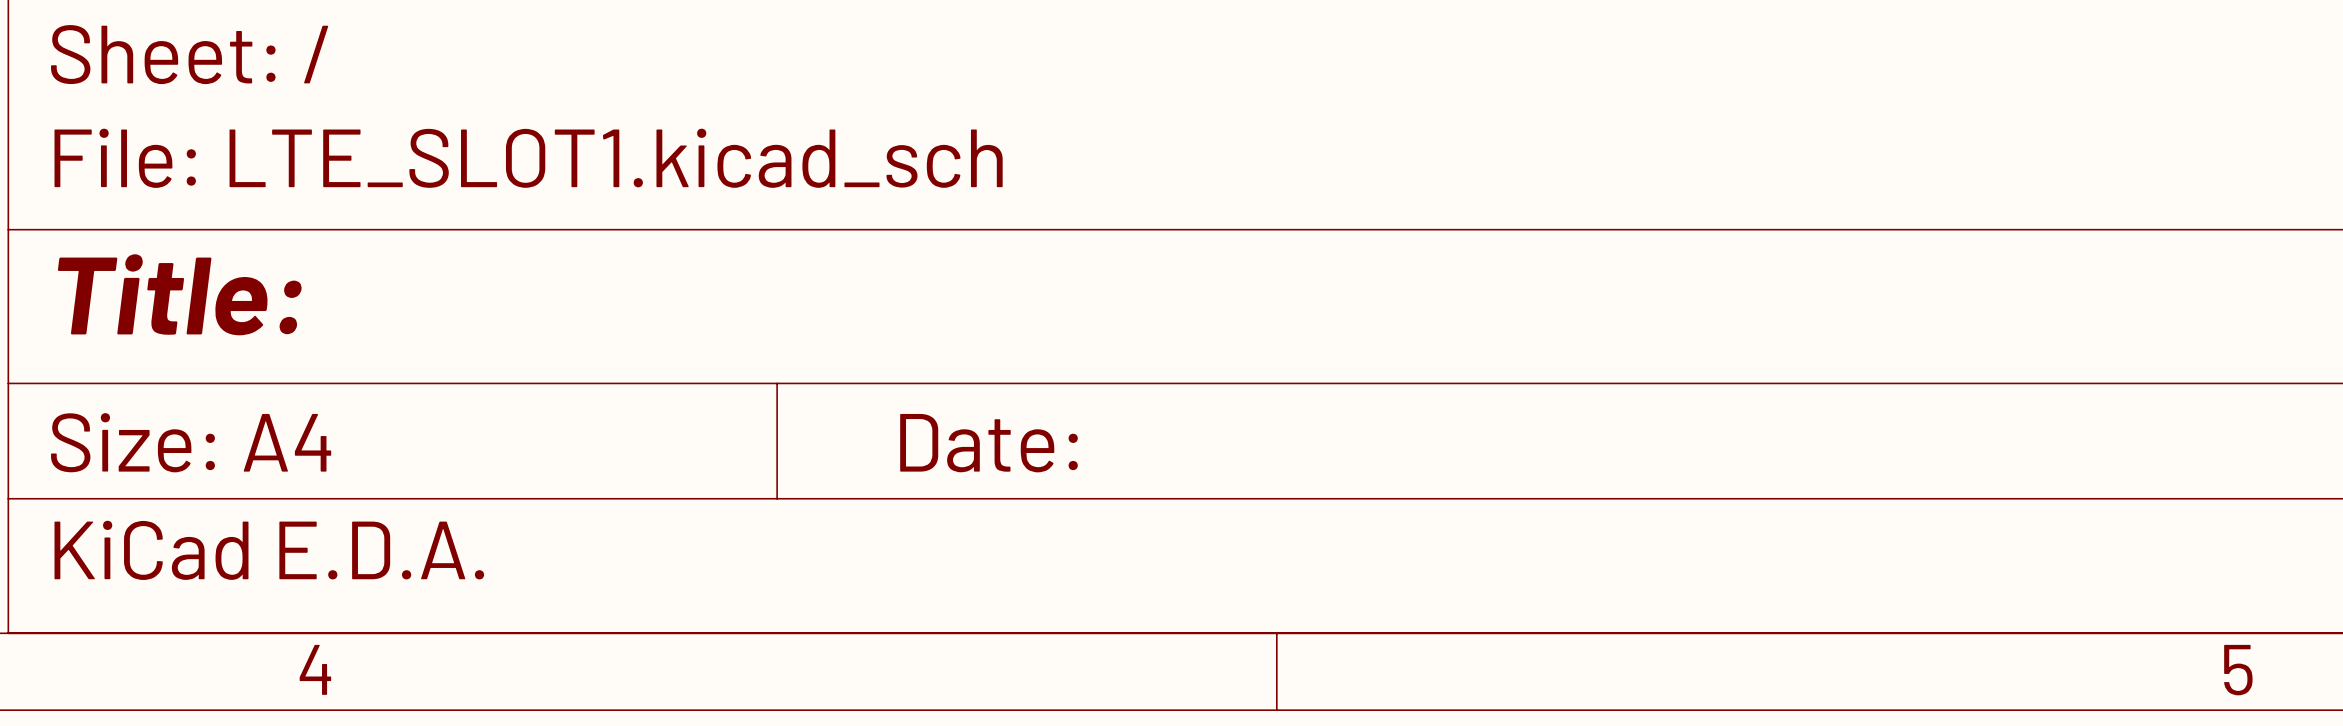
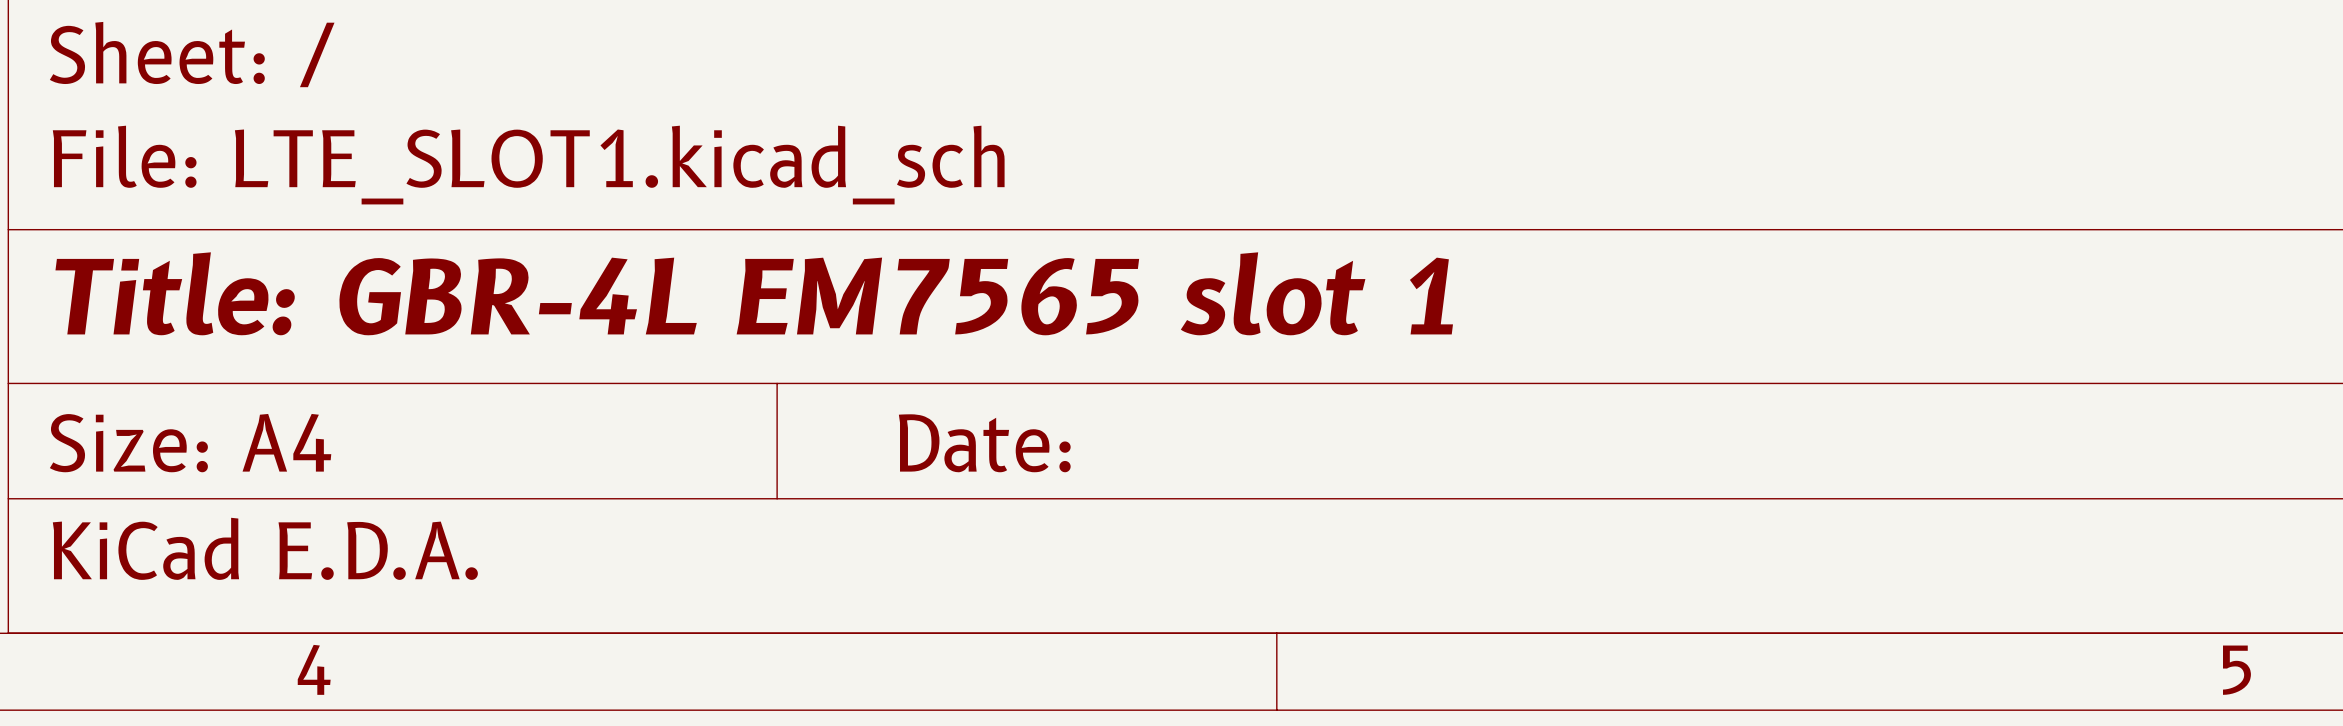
title block: Title: (179, 294) -> Title: GBR-4L EM7565 slot 1 (754, 293)

